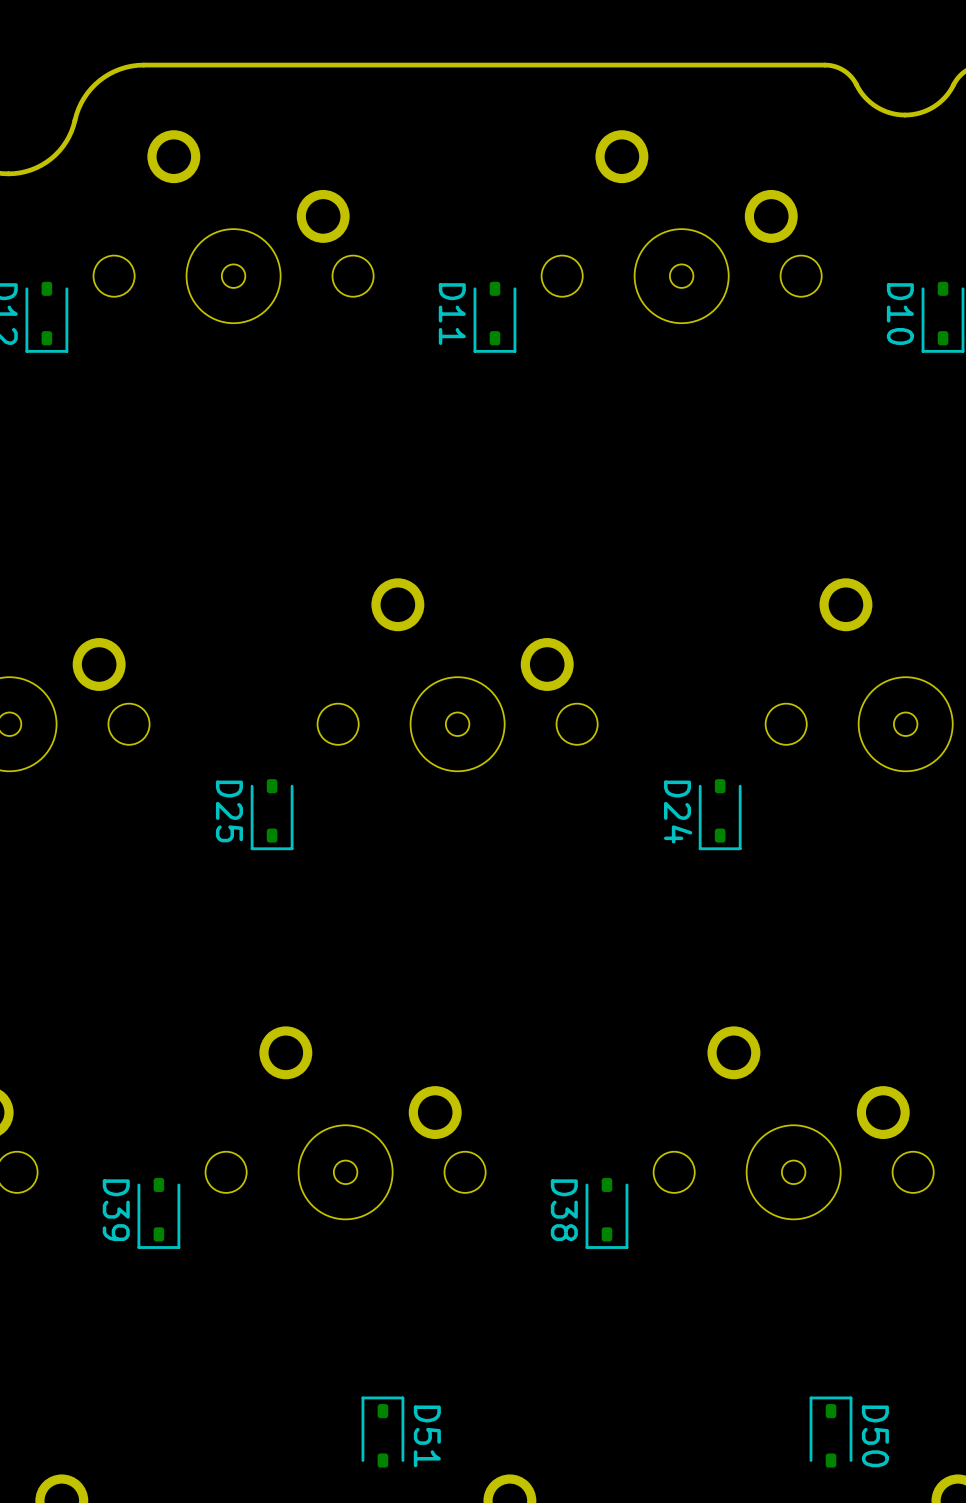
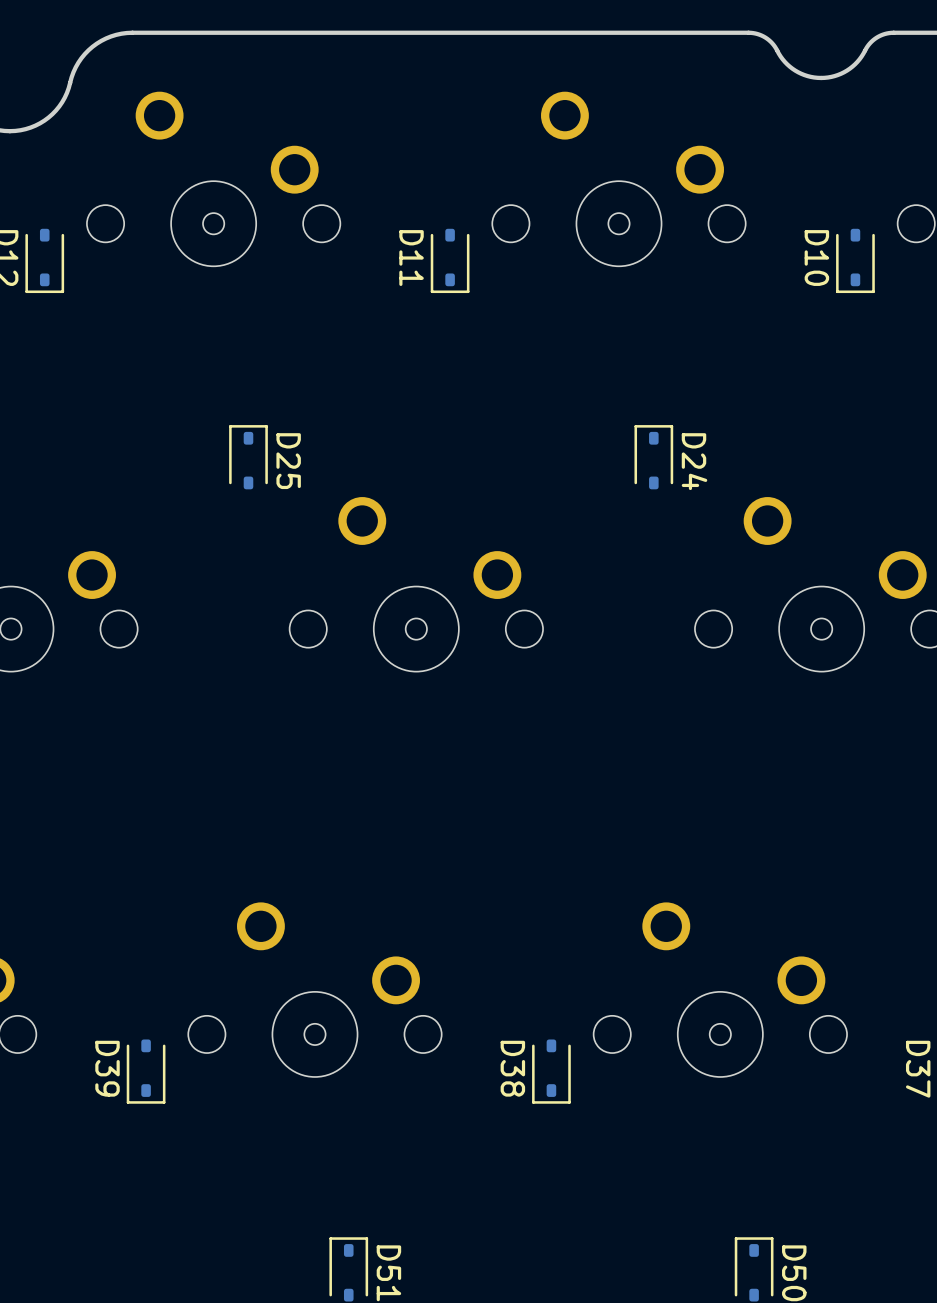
D25 rotation: 0° (272, 814) -> 180° (248, 457)
D25 position: (272, 814) -> (248, 457)
D24 rotation: 0° (720, 814) -> 180° (653, 457)
D24 position: (720, 814) -> (653, 457)

